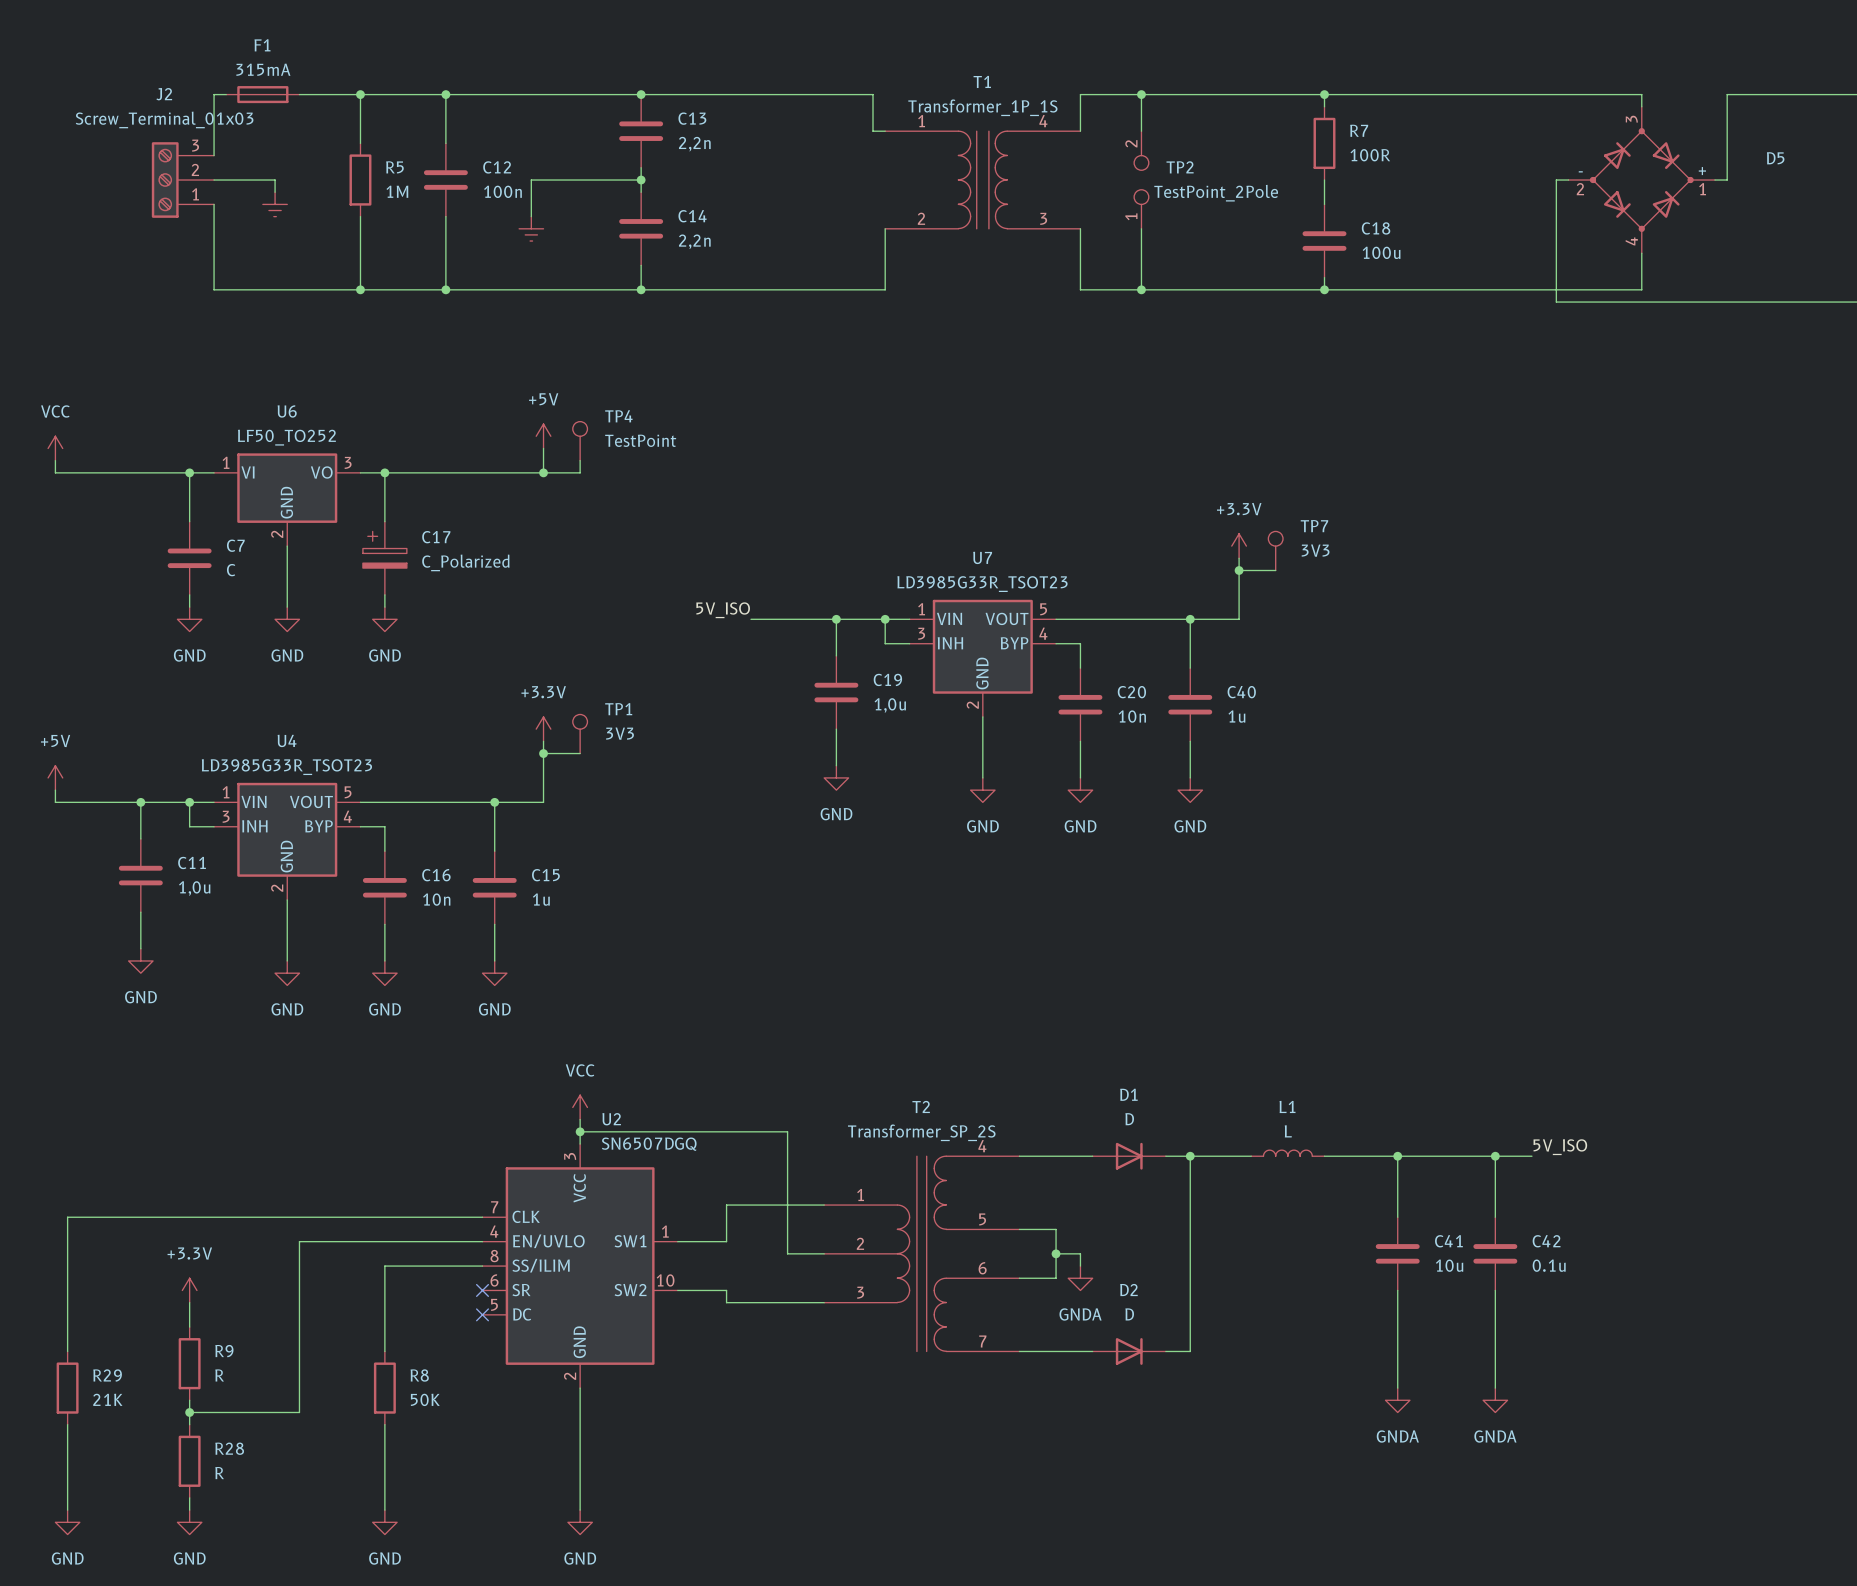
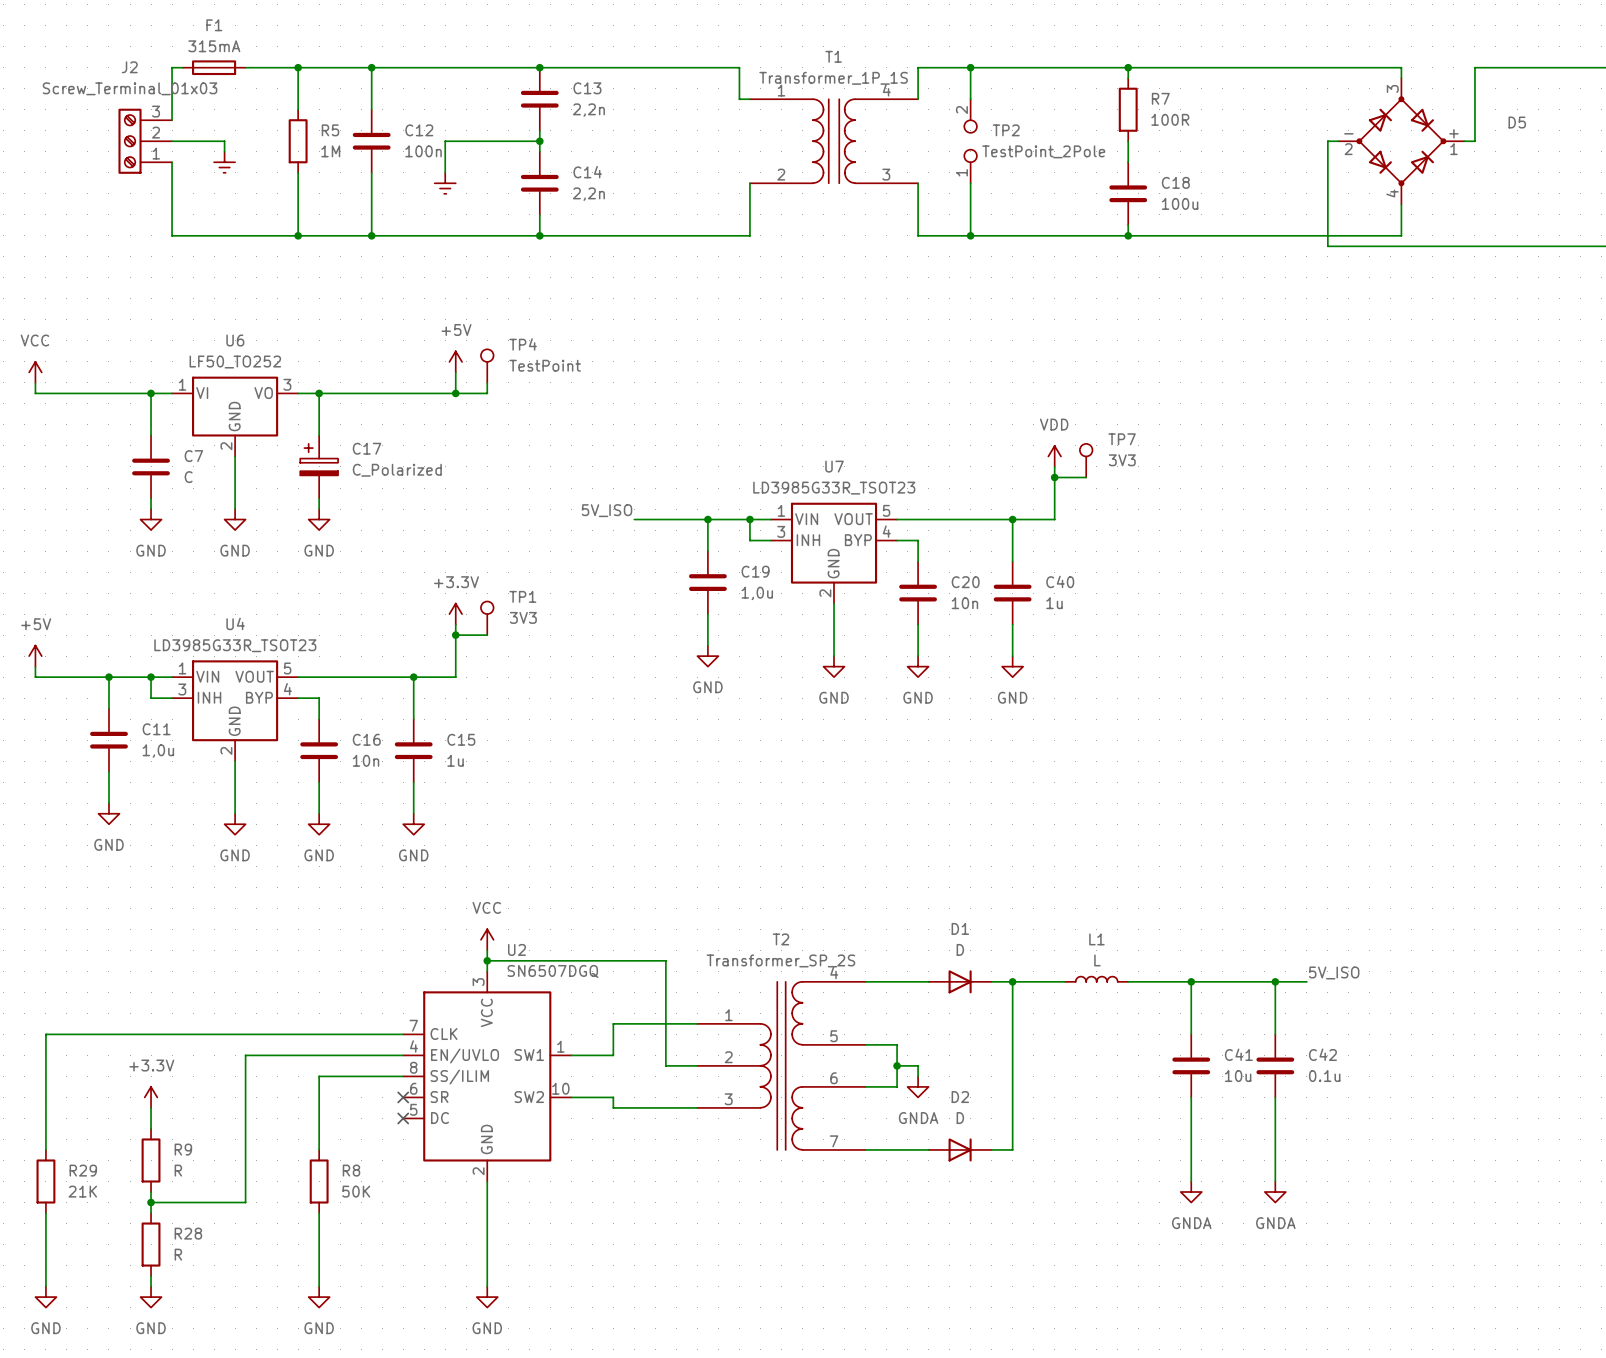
power symbol: +3.3V (1239, 546) -> VDD (1054, 456)

